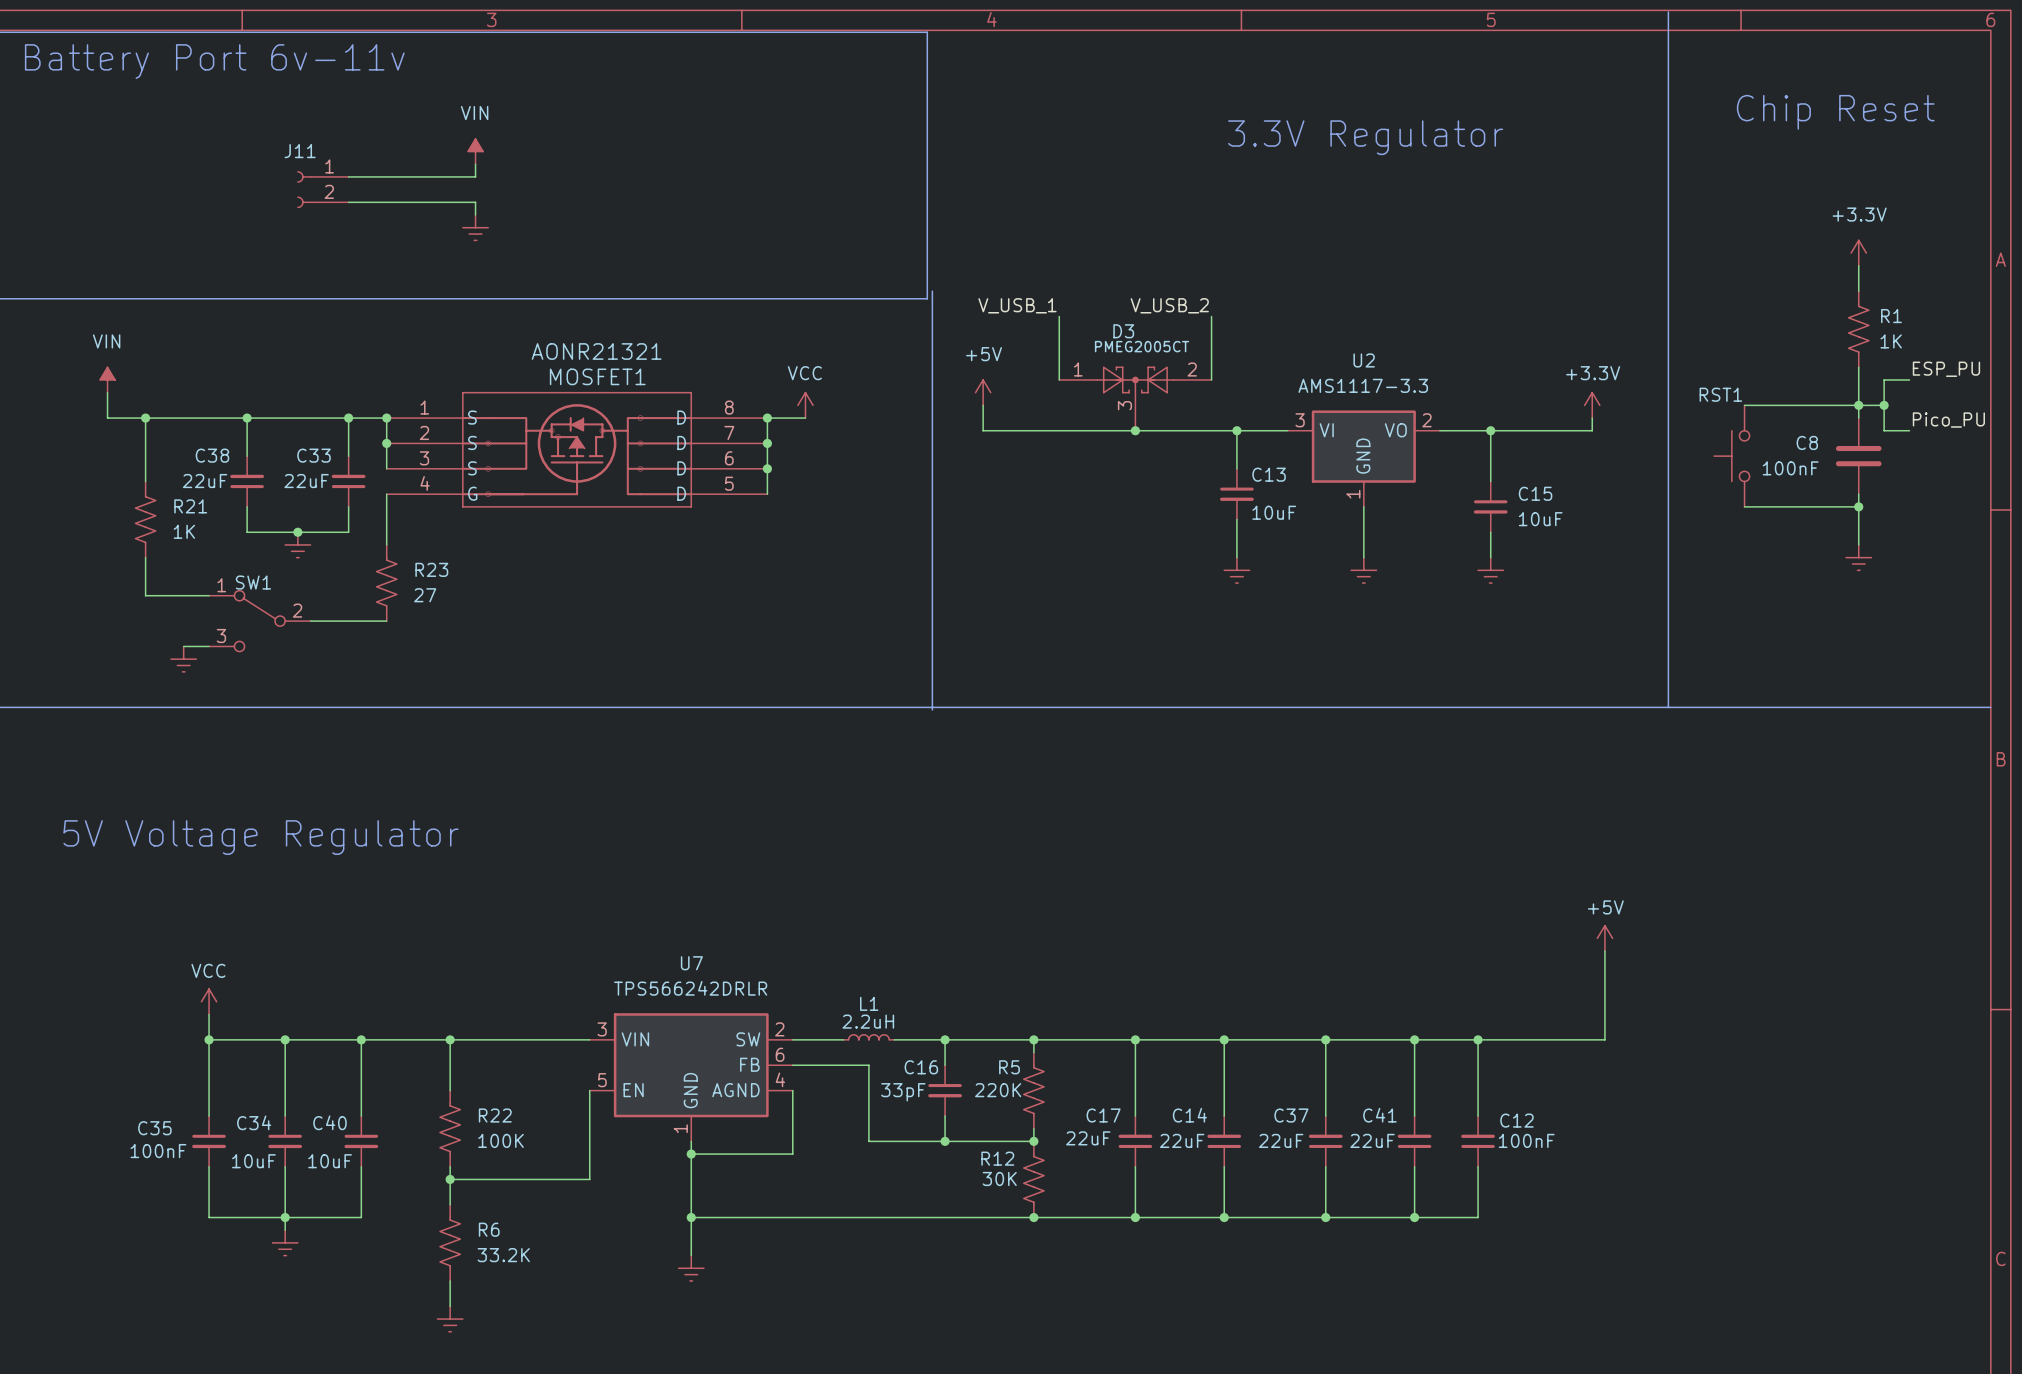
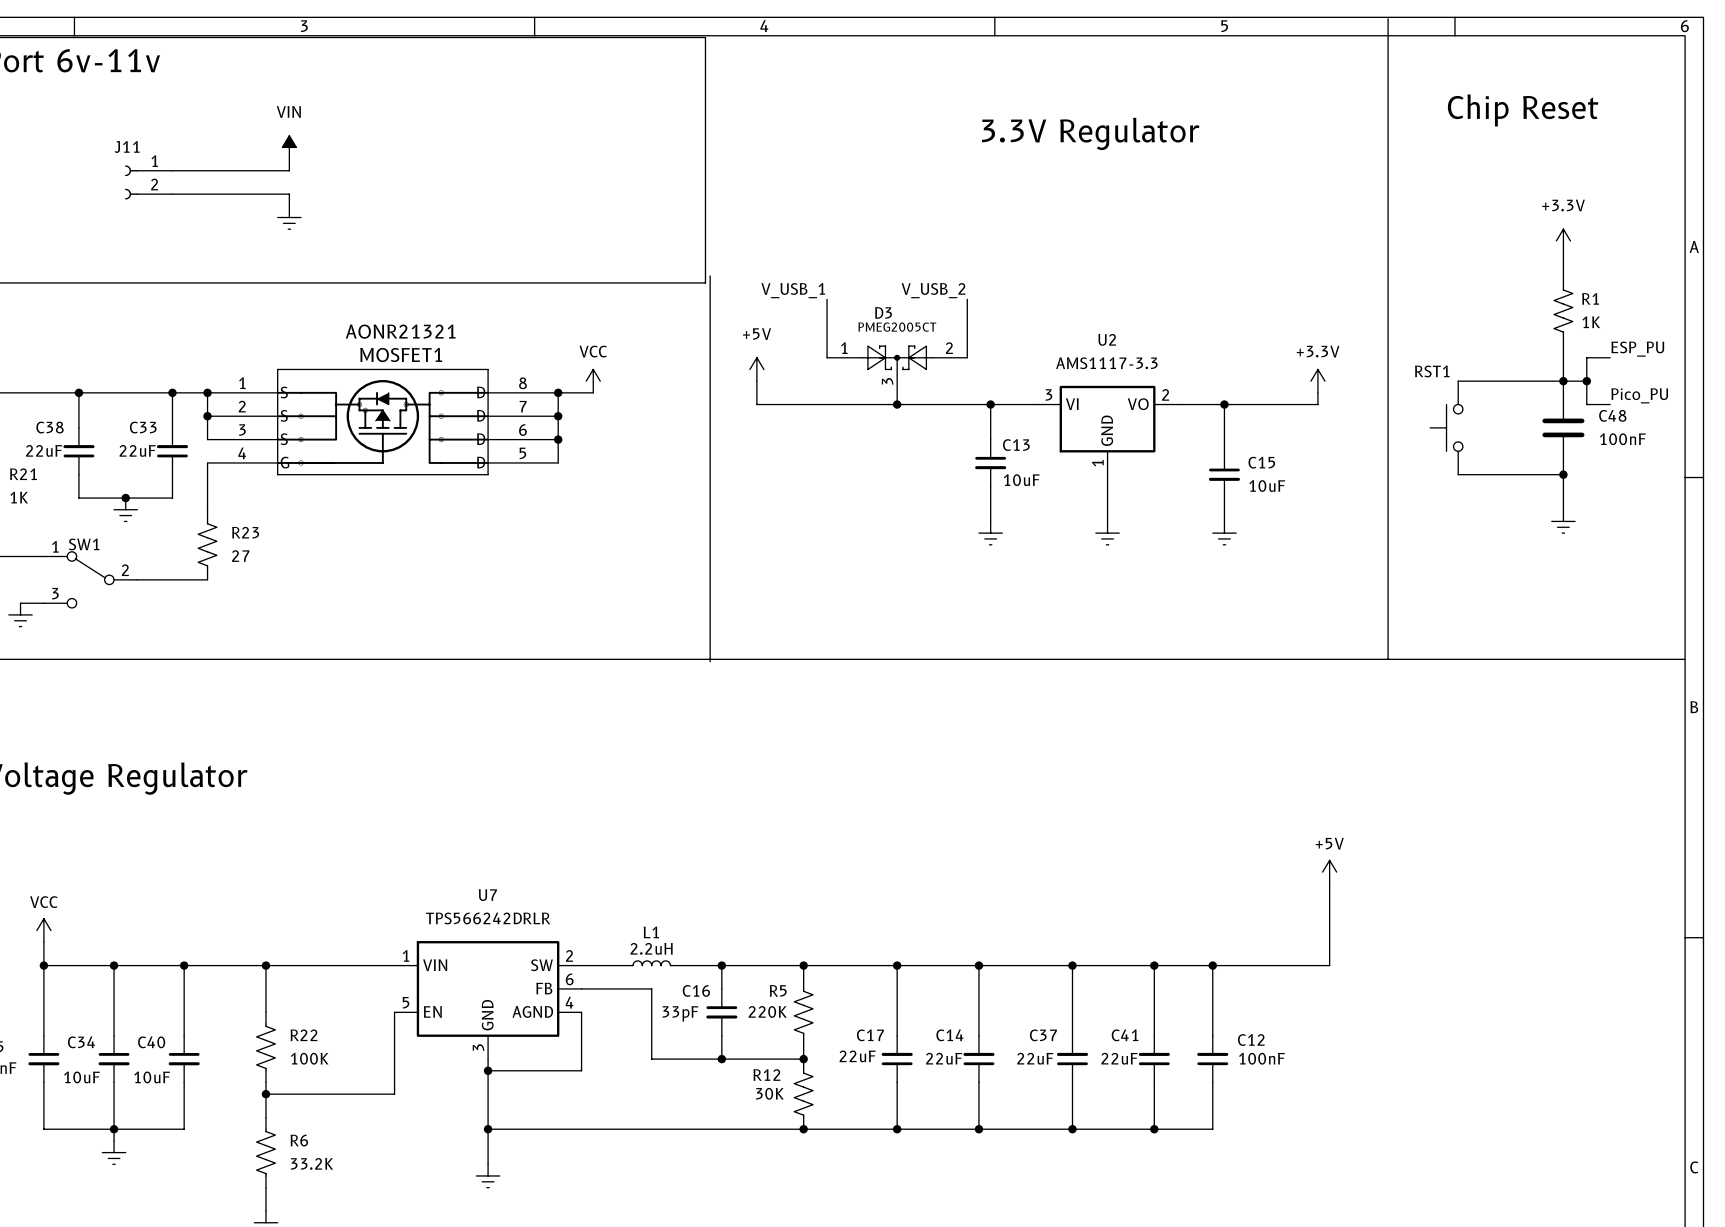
C8 name: C8 (1807, 442) -> C48 (1612, 415)
C8 value position: 100nF (1790, 468) -> 100nF (1622, 439)
U7 pin number: 3 (602, 1029) -> 1 (406, 955)
U7 pin number: 1 (680, 1128) -> 3 (478, 1047)

